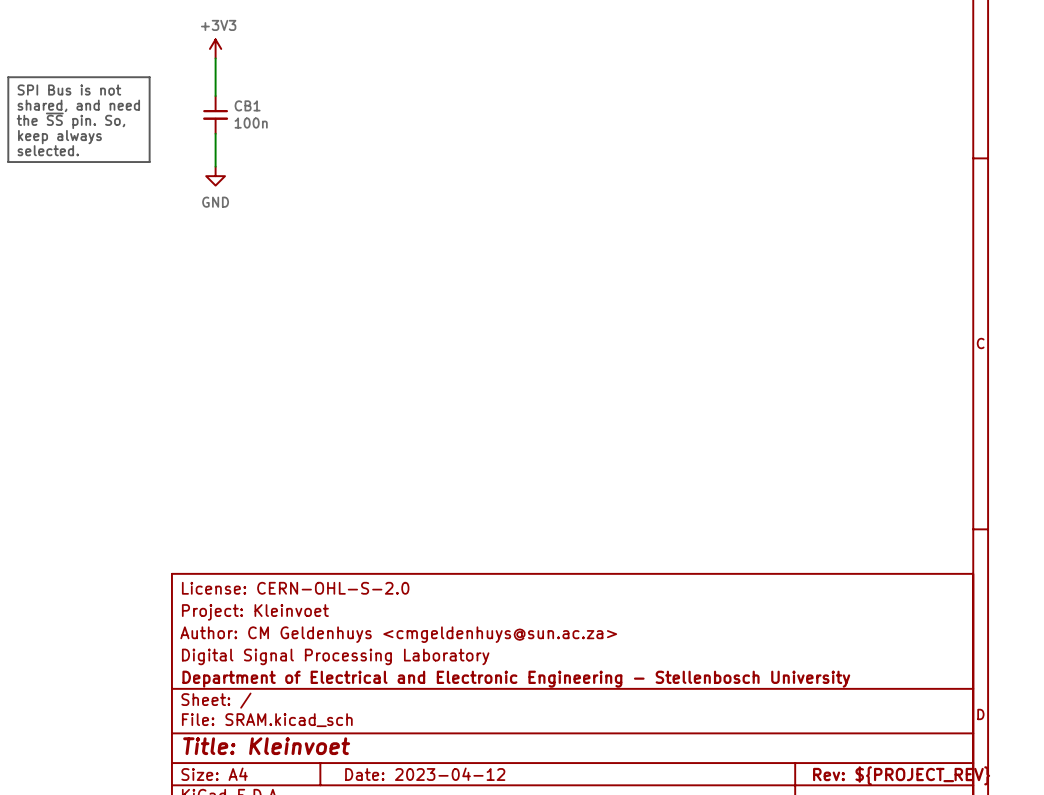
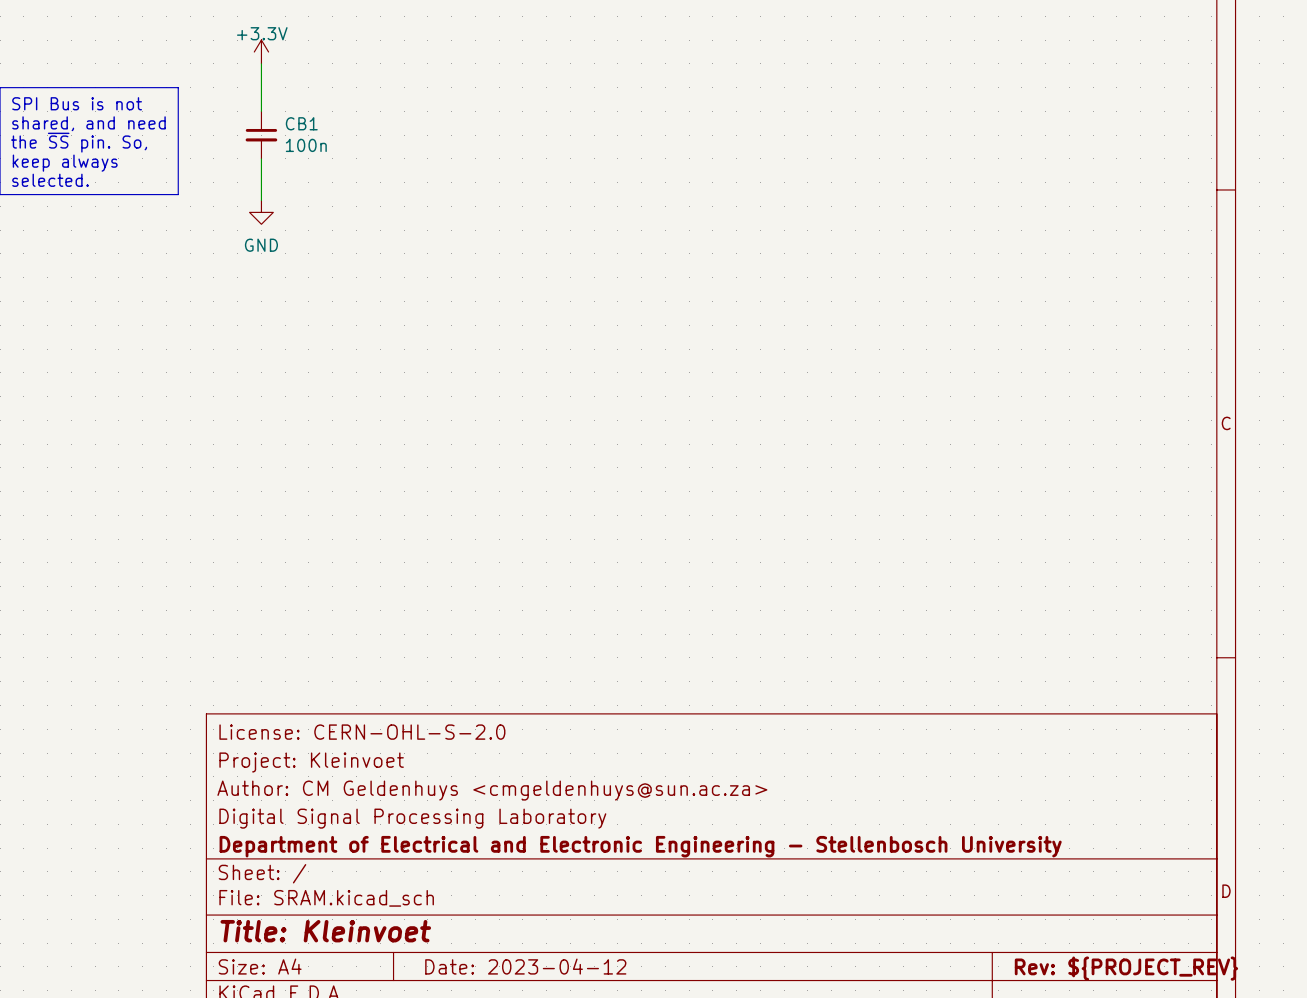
power symbol: +3V3 (215, 48) -> +3.3V (261, 51)

